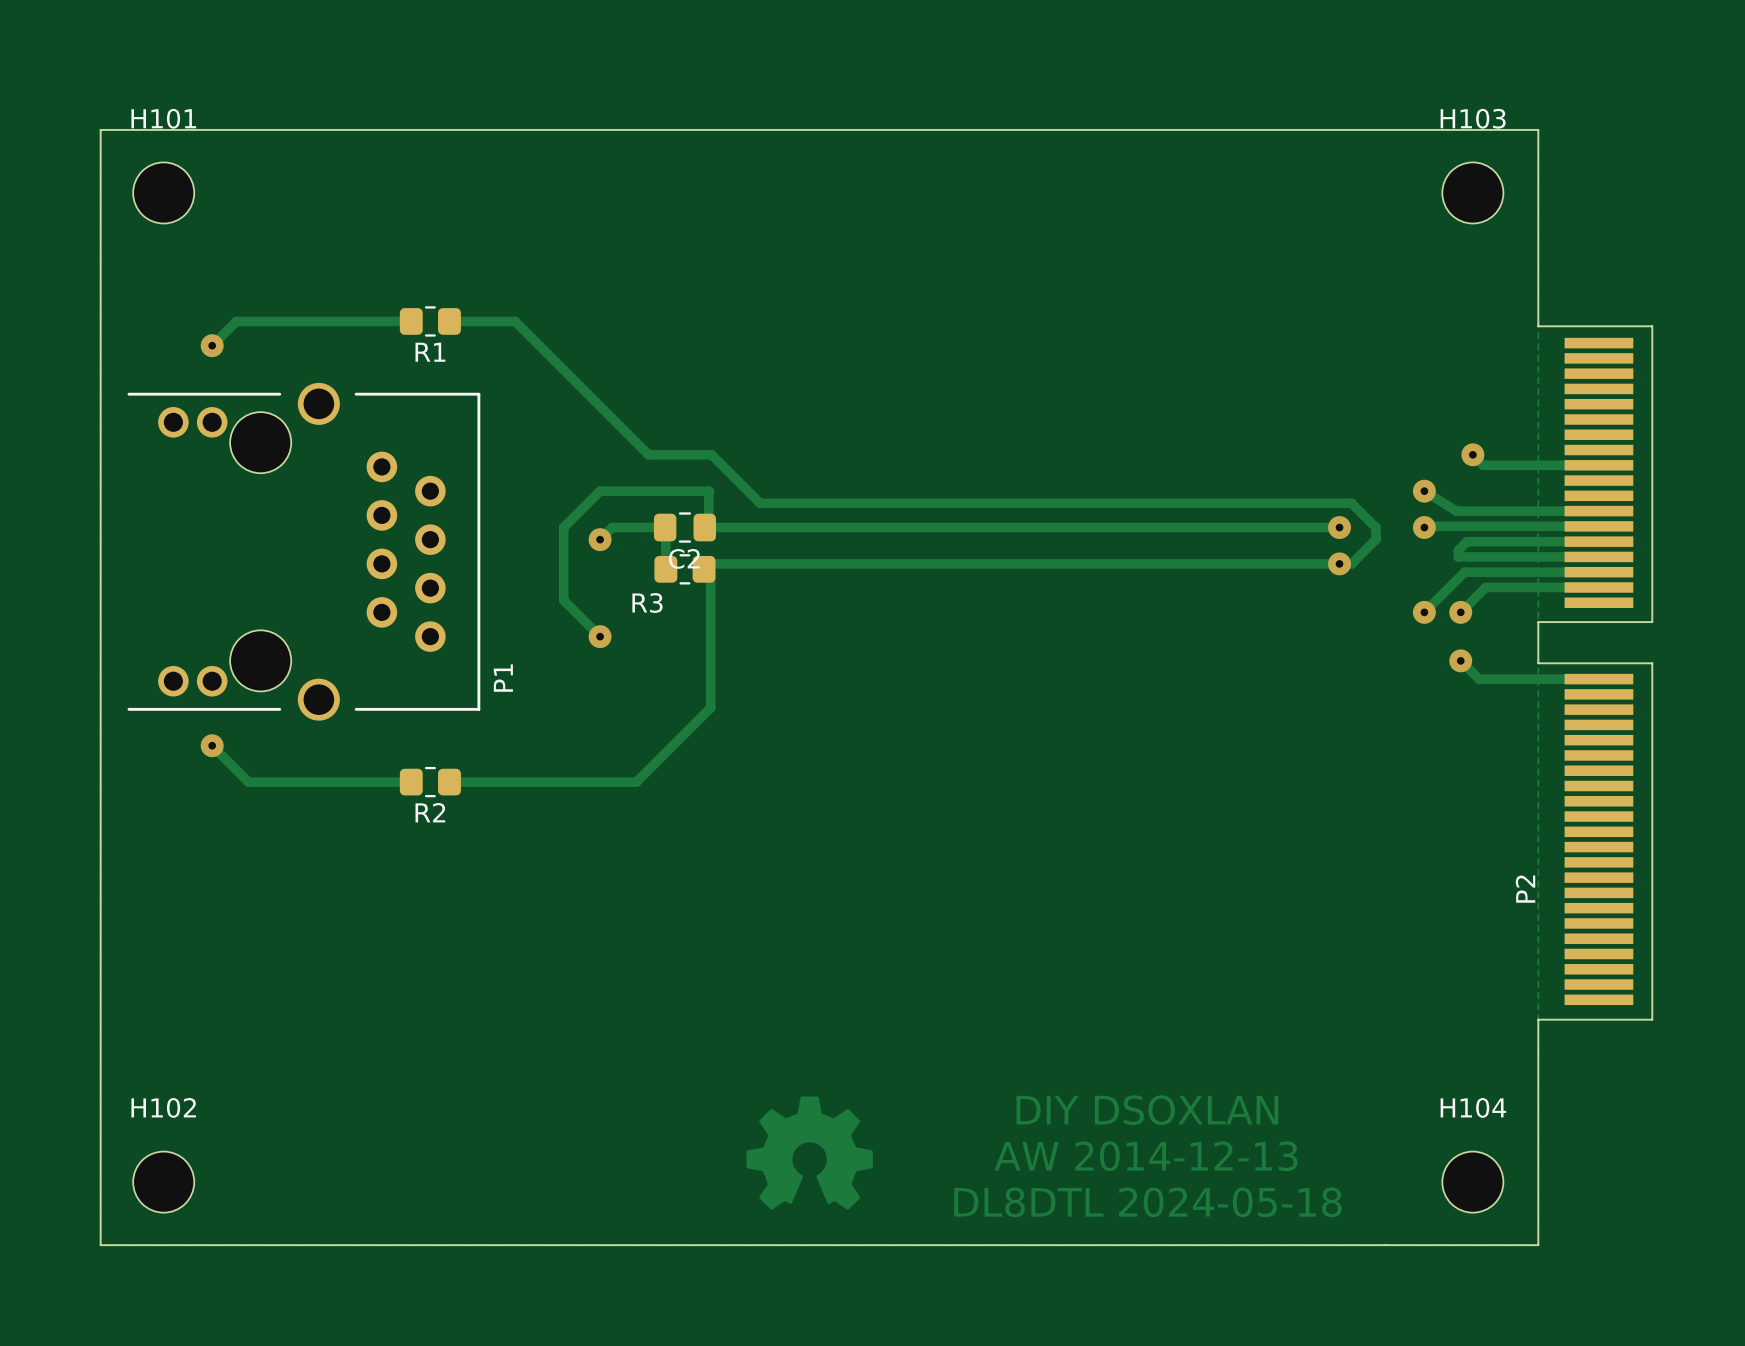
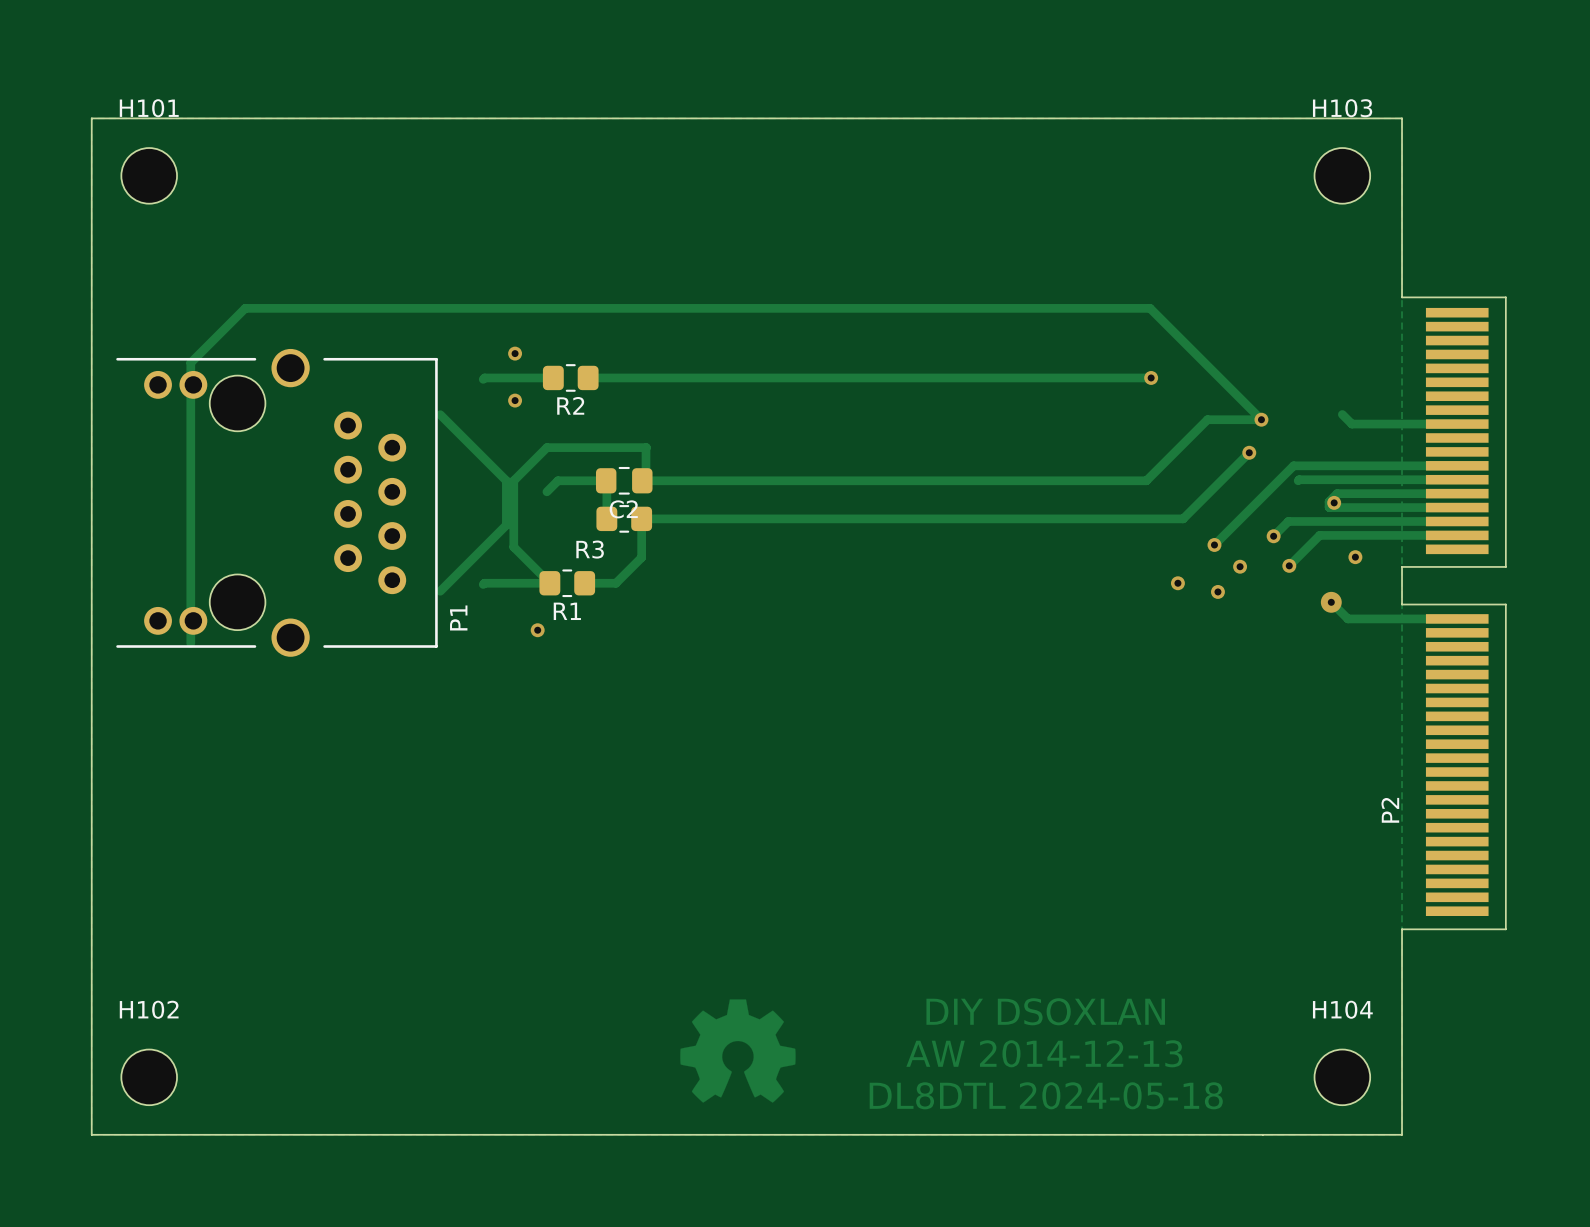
track: (404, 321) (236, 321) (212, 345) -> none
R1 position: (430, 321) -> (567, 583)
track: (456, 321) (515, 321) (648, 454) (711, 454) (760, 503) (1351, 503) (1375, 527) (1375, 539) (1351, 563) (709, 563) (704, 569) (710, 576) (710, 707) (636, 782) (456, 782) -> none
via: (212, 345) -> none
via: none -> (515, 353)
track: none -> (553, 377) (483, 379)
track: none -> (588, 377) (1151, 377)
via: none -> (1151, 377)
via: none -> (515, 400)
track: none -> (440, 414) (506, 480) (506, 525) (440, 591)
via: (1472, 454) -> none
via: none -> (1261, 419)
track: (1424, 491) (1456, 511) -> (1214, 544) (1293, 465) (1327, 465)
via: (1424, 491) -> none
track: none -> (1249, 452) (1183, 518) (641, 518) (641, 557) (615, 583) (584, 583)
via: none -> (1249, 452)
track: (1257, 527) (1339, 527) -> (1146, 480) (1207, 419) (1261, 419) (1150, 308) (245, 308) (190, 362) (190, 643)
via: (1339, 527) -> none
via: (1424, 527) -> none
via: (600, 539) -> none
via: none -> (1334, 502)
via: (1339, 563) -> none
track: (1464, 572) (1424, 612) -> (1334, 521) (1288, 521) (1273, 536)
track: (1485, 587) (1460, 612) -> (1354, 535) (1319, 535) (1289, 565)
via: none -> (1273, 536)
via: none -> (1214, 544)
via size: [1412, 600, 1436, 624] -> [1282, 558, 1297, 573]
via: none -> (1355, 557)
via: (1460, 612) -> none
via: none -> (1240, 566)
via: (600, 636) -> none
track: none -> (549, 583) (483, 584)
via: none -> (1177, 583)
via: none -> (1217, 591)
via: none -> (537, 630)
track: (212, 745) (248, 782) (404, 782) -> none
via: (212, 745) -> none
R2 position: (430, 782) -> (570, 377)

